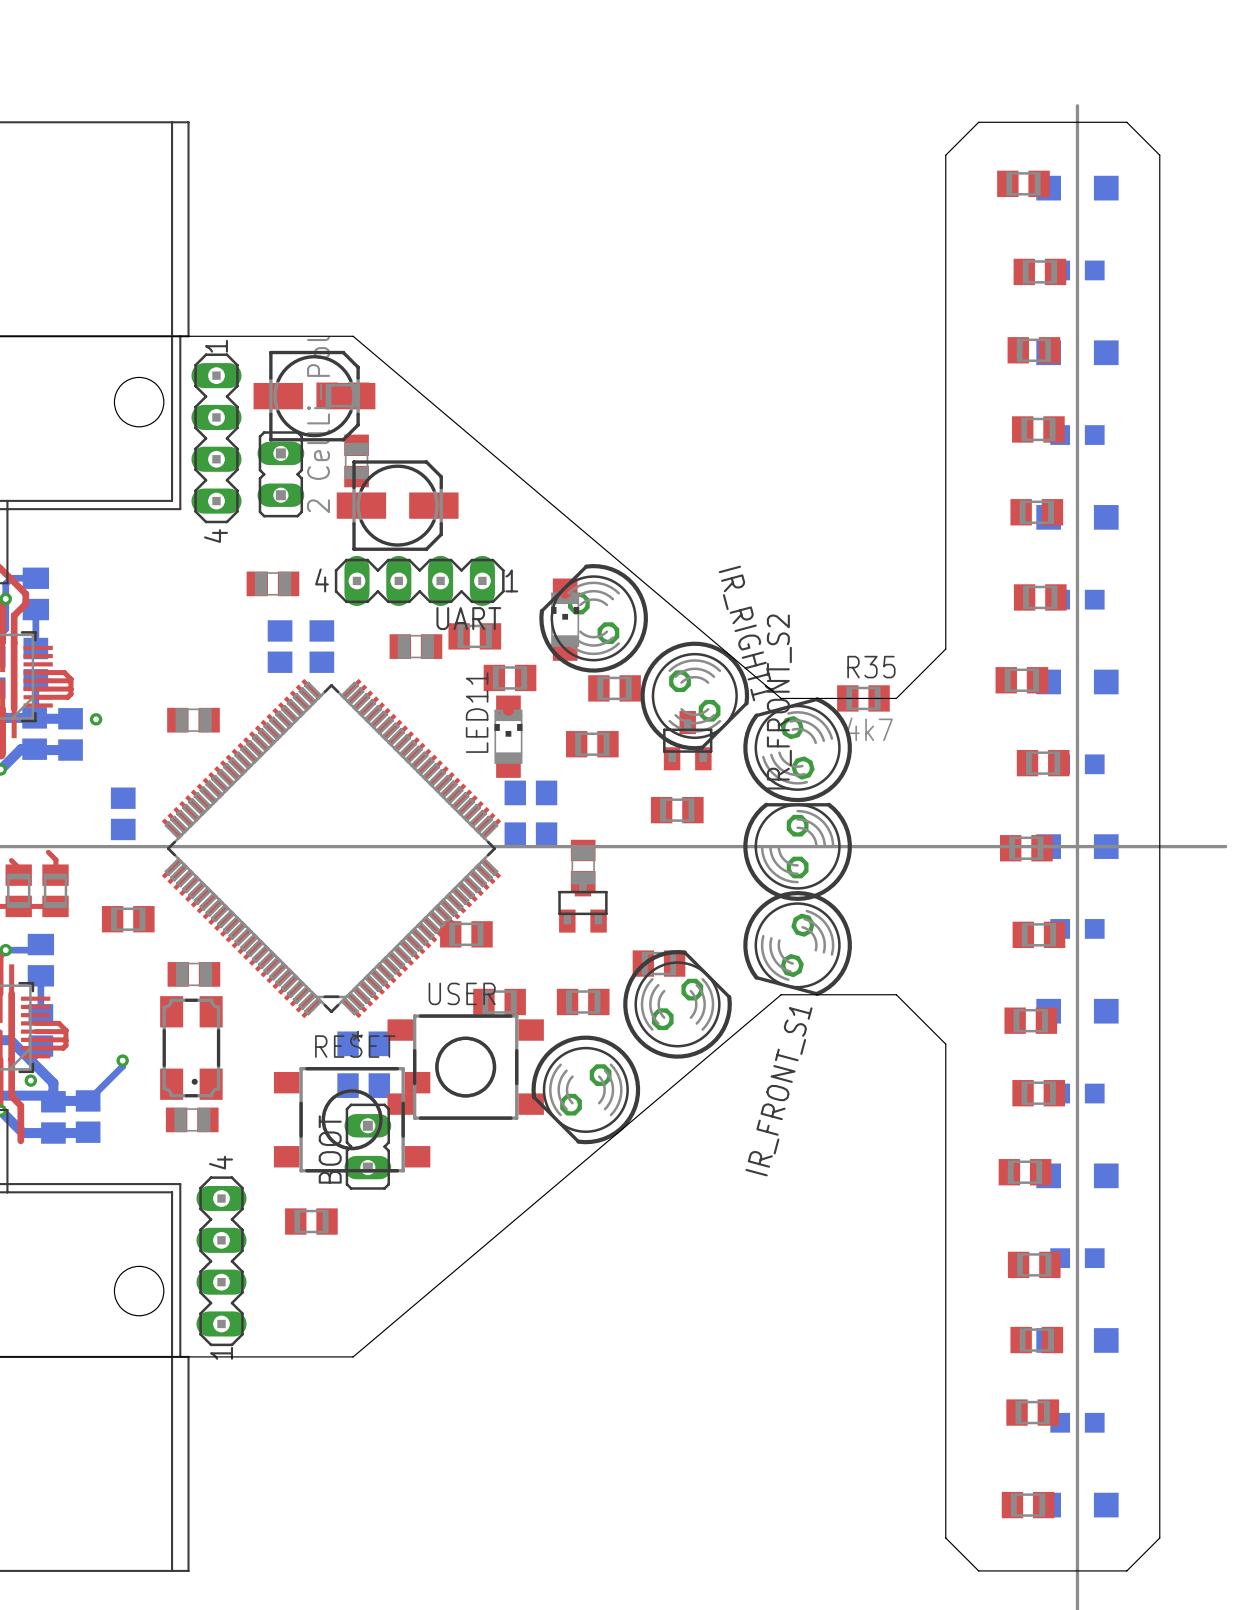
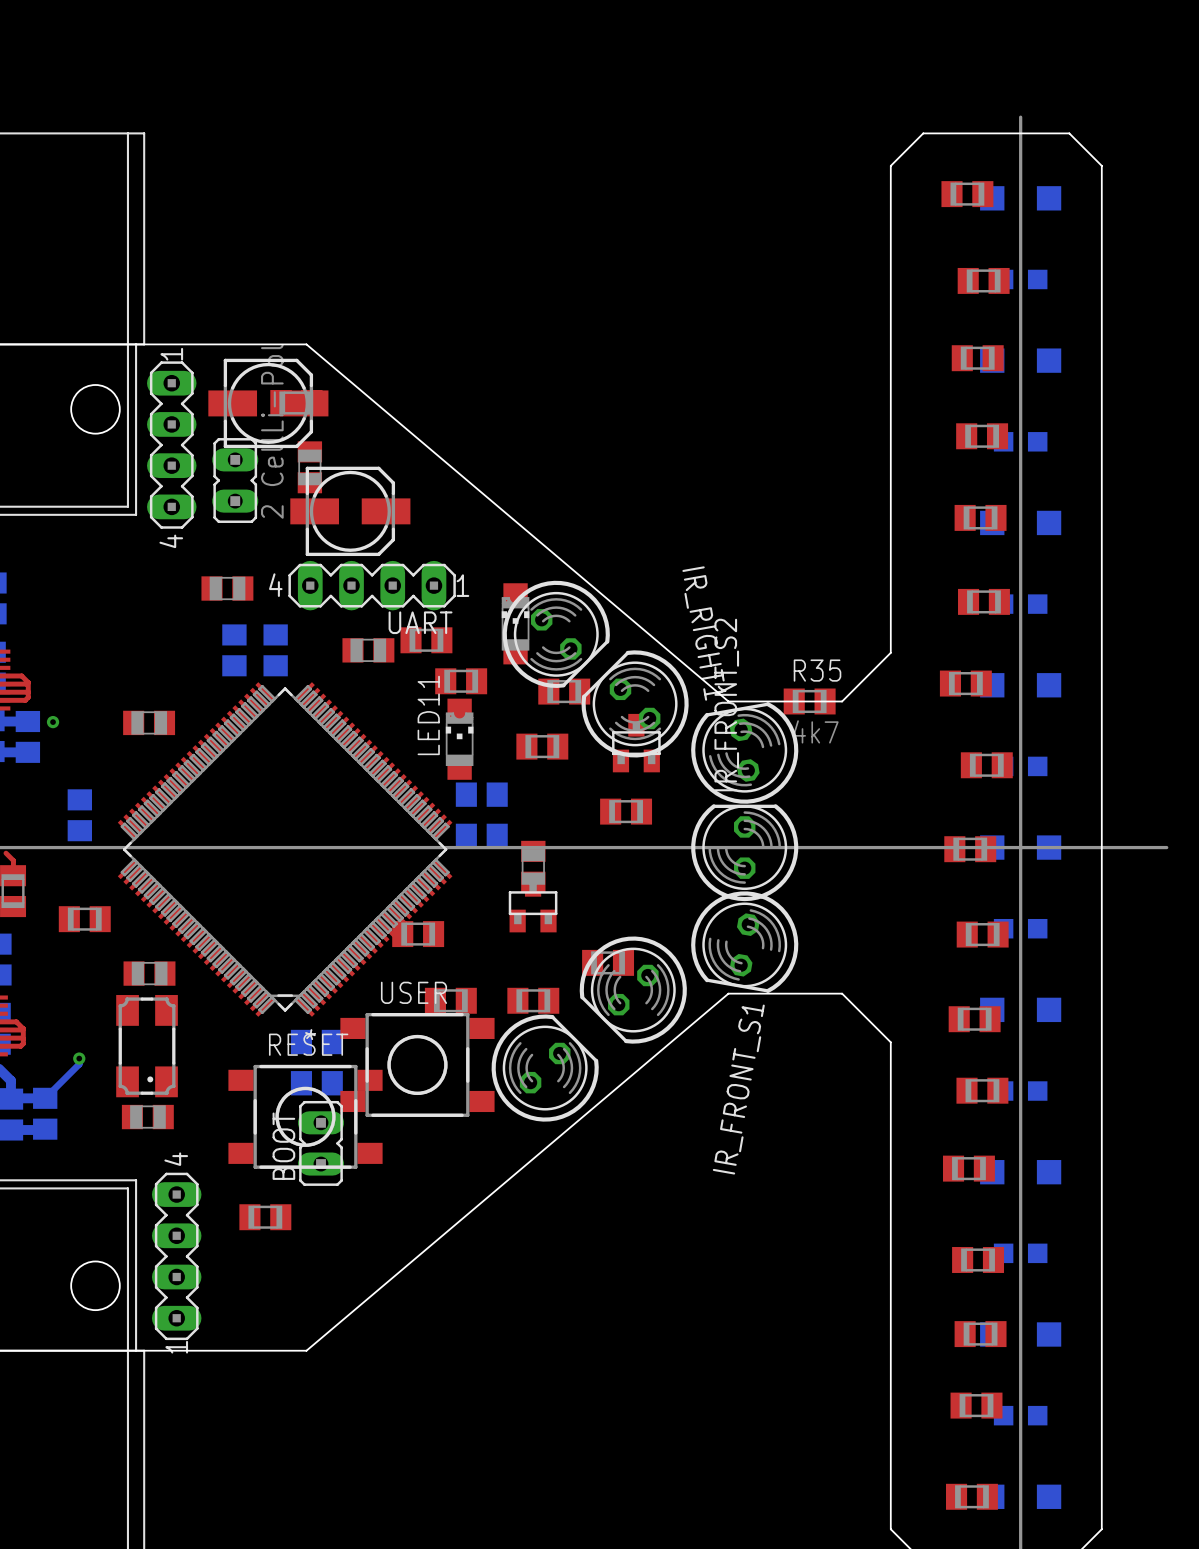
part rotation: 0° (593, 618) -> 180° (556, 634)
part rotation: 0° (694, 695) -> 180° (635, 703)
IR_RIGHT1 rotation: 0° (797, 749) -> 5° clockwise (744, 752)
IR_FRONT_S1 rotation: 0° (797, 943) -> 5° counterclockwise (744, 942)
part rotation: 0° (677, 1004) -> 180° (633, 990)
part rotation: 0° (585, 1089) -> 180° (545, 1068)

